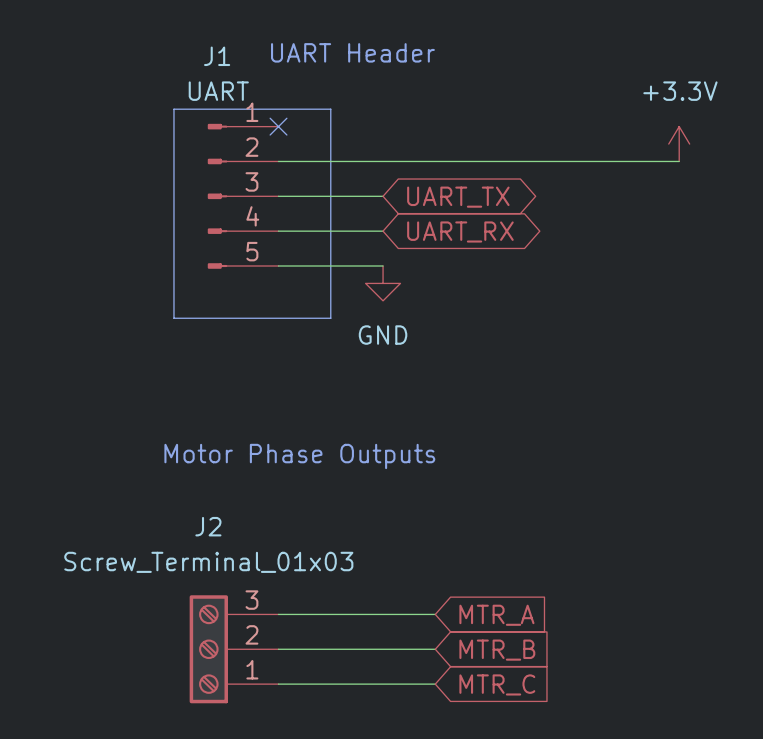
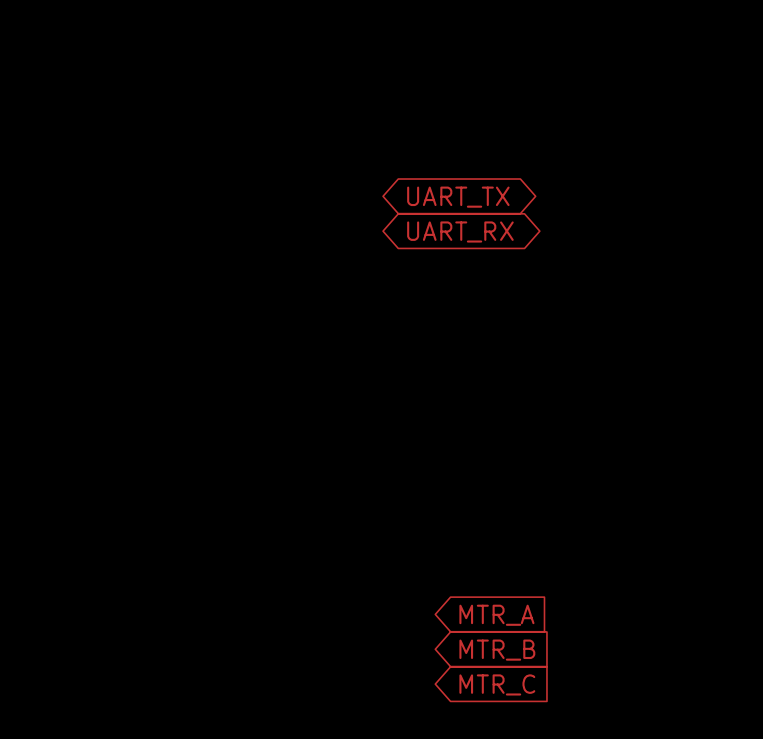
text: UART Header (352, 52) -> none
line: (173, 109) (330, 109) (330, 318) (173, 318) (173, 109) -> none
no-connect mark: (278, 126) -> none
power symbol: +3.3V (679, 144) -> none
wire: (278, 161) (679, 161) -> none
J1: UART (243, 196) -> none
wire: (278, 196) (383, 196) -> none
wire: (278, 231) (383, 231) -> none
wire: (278, 266) (383, 266) -> none
power symbol: GND (383, 283) -> none
text: Motor Phase Outputs (299, 456) -> none
wire: (278, 614) (435, 614) -> none
J2: Screw_Terminal_01x03 (234, 649) -> none
wire: (278, 649) (435, 649) -> none
wire: (278, 684) (435, 684) -> none

